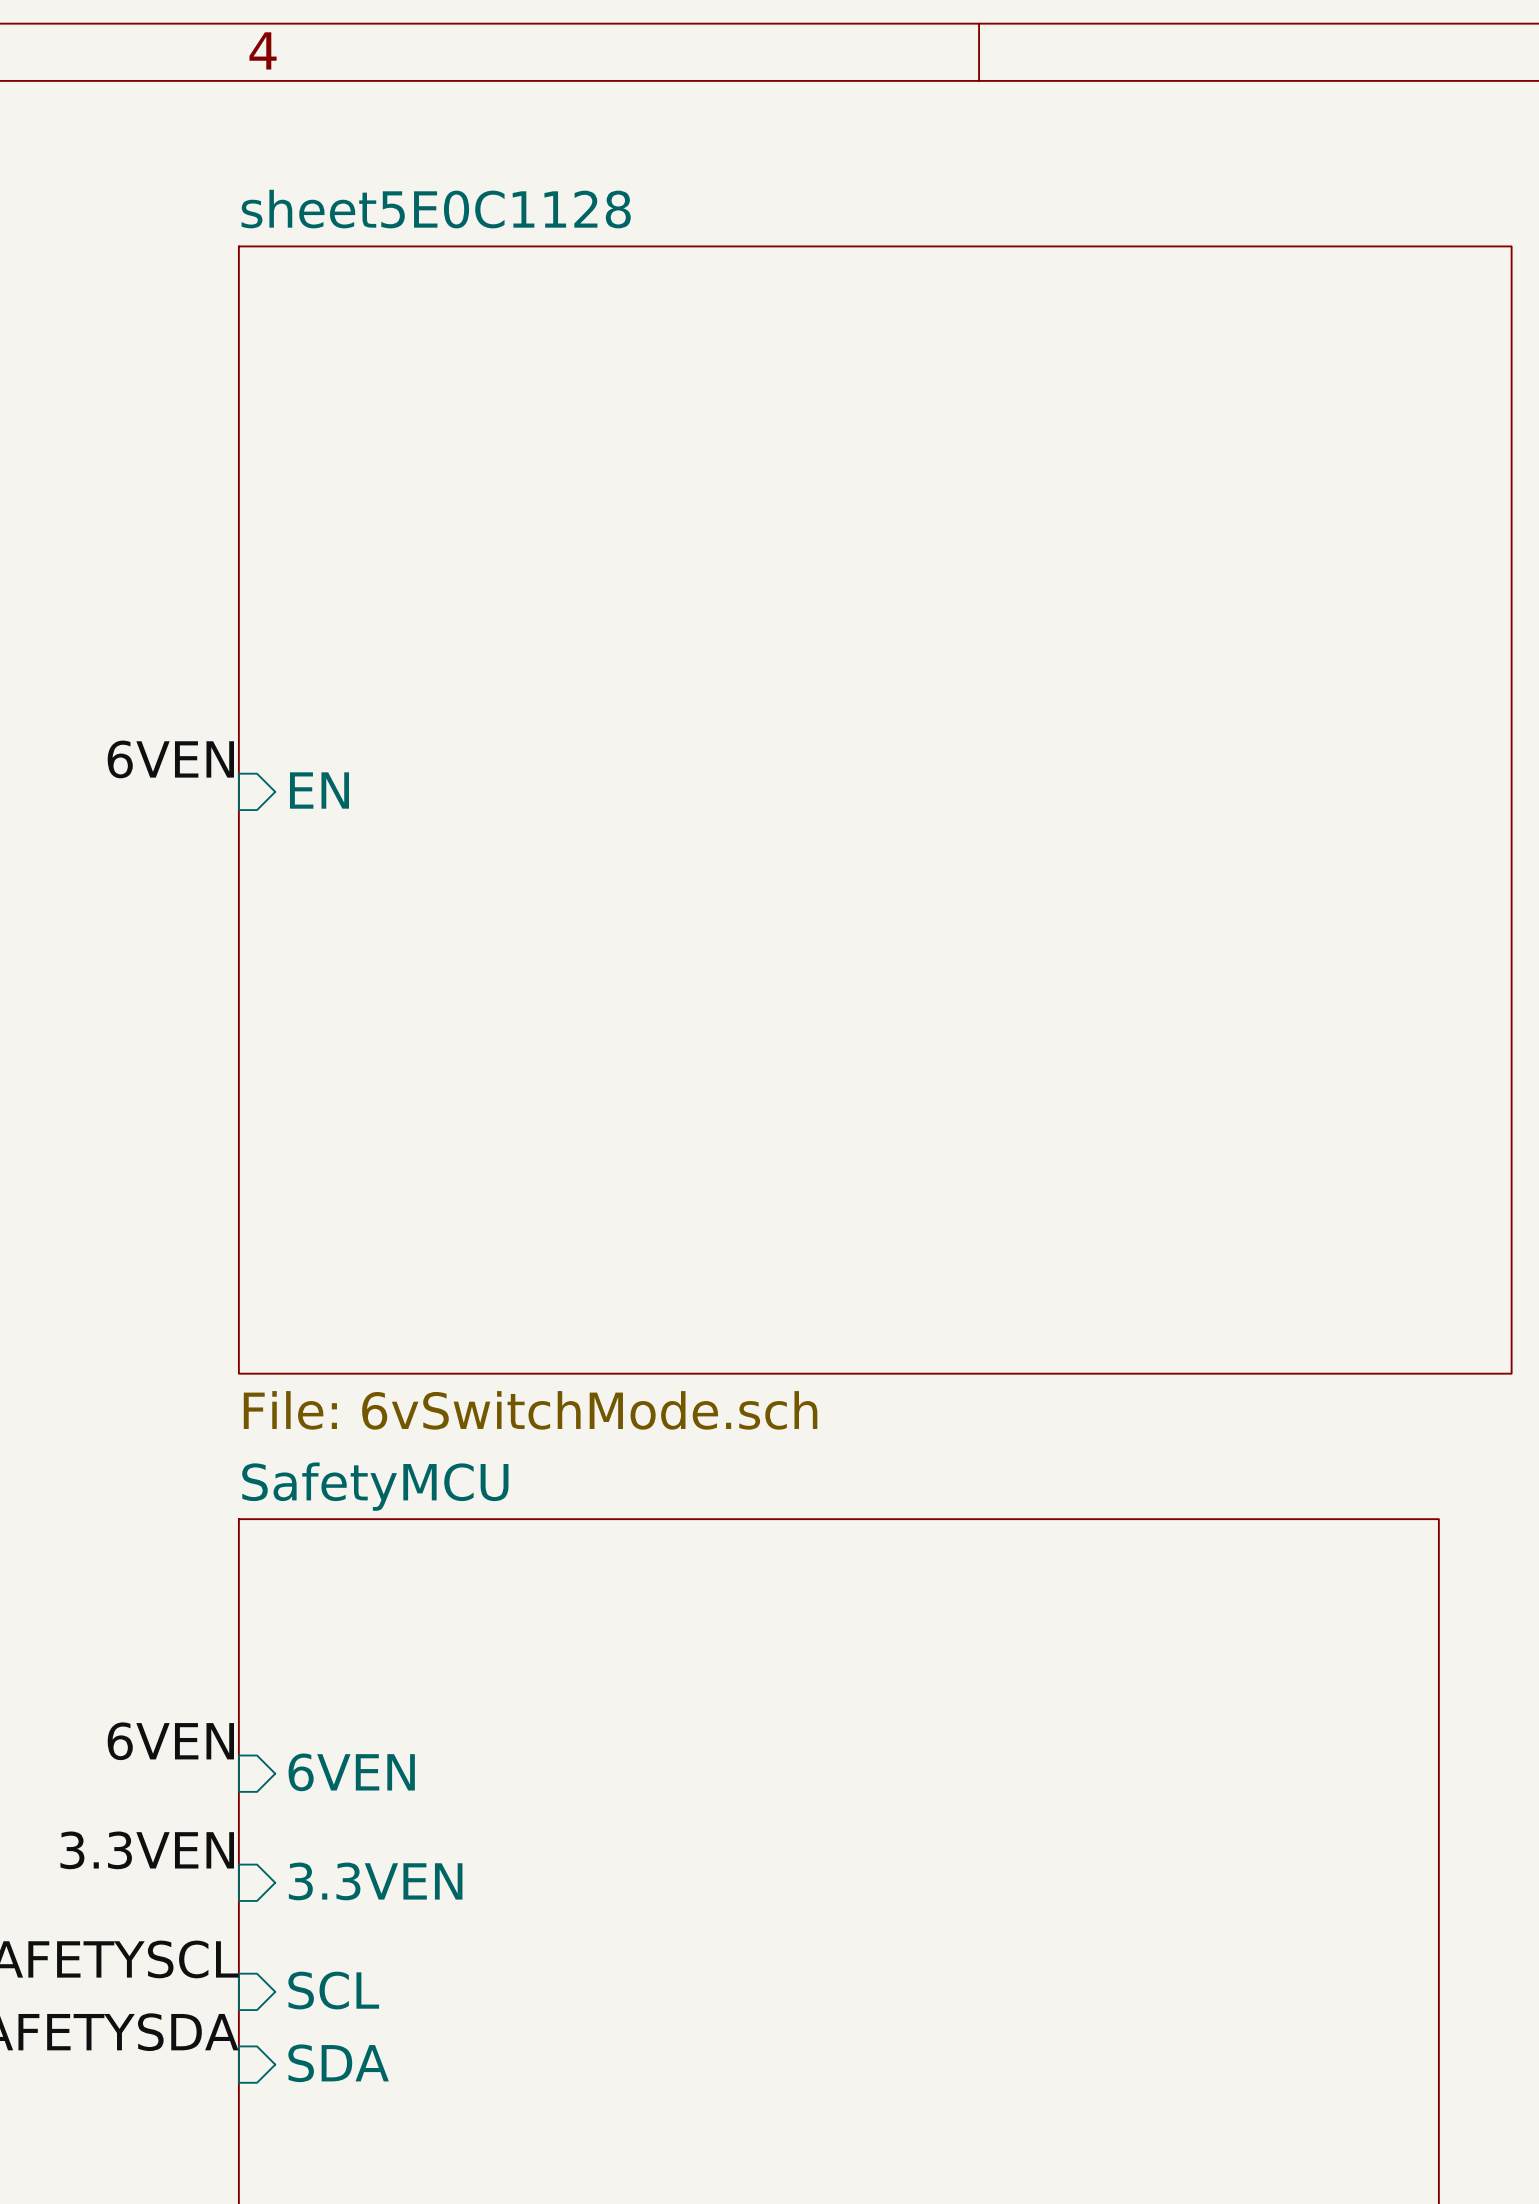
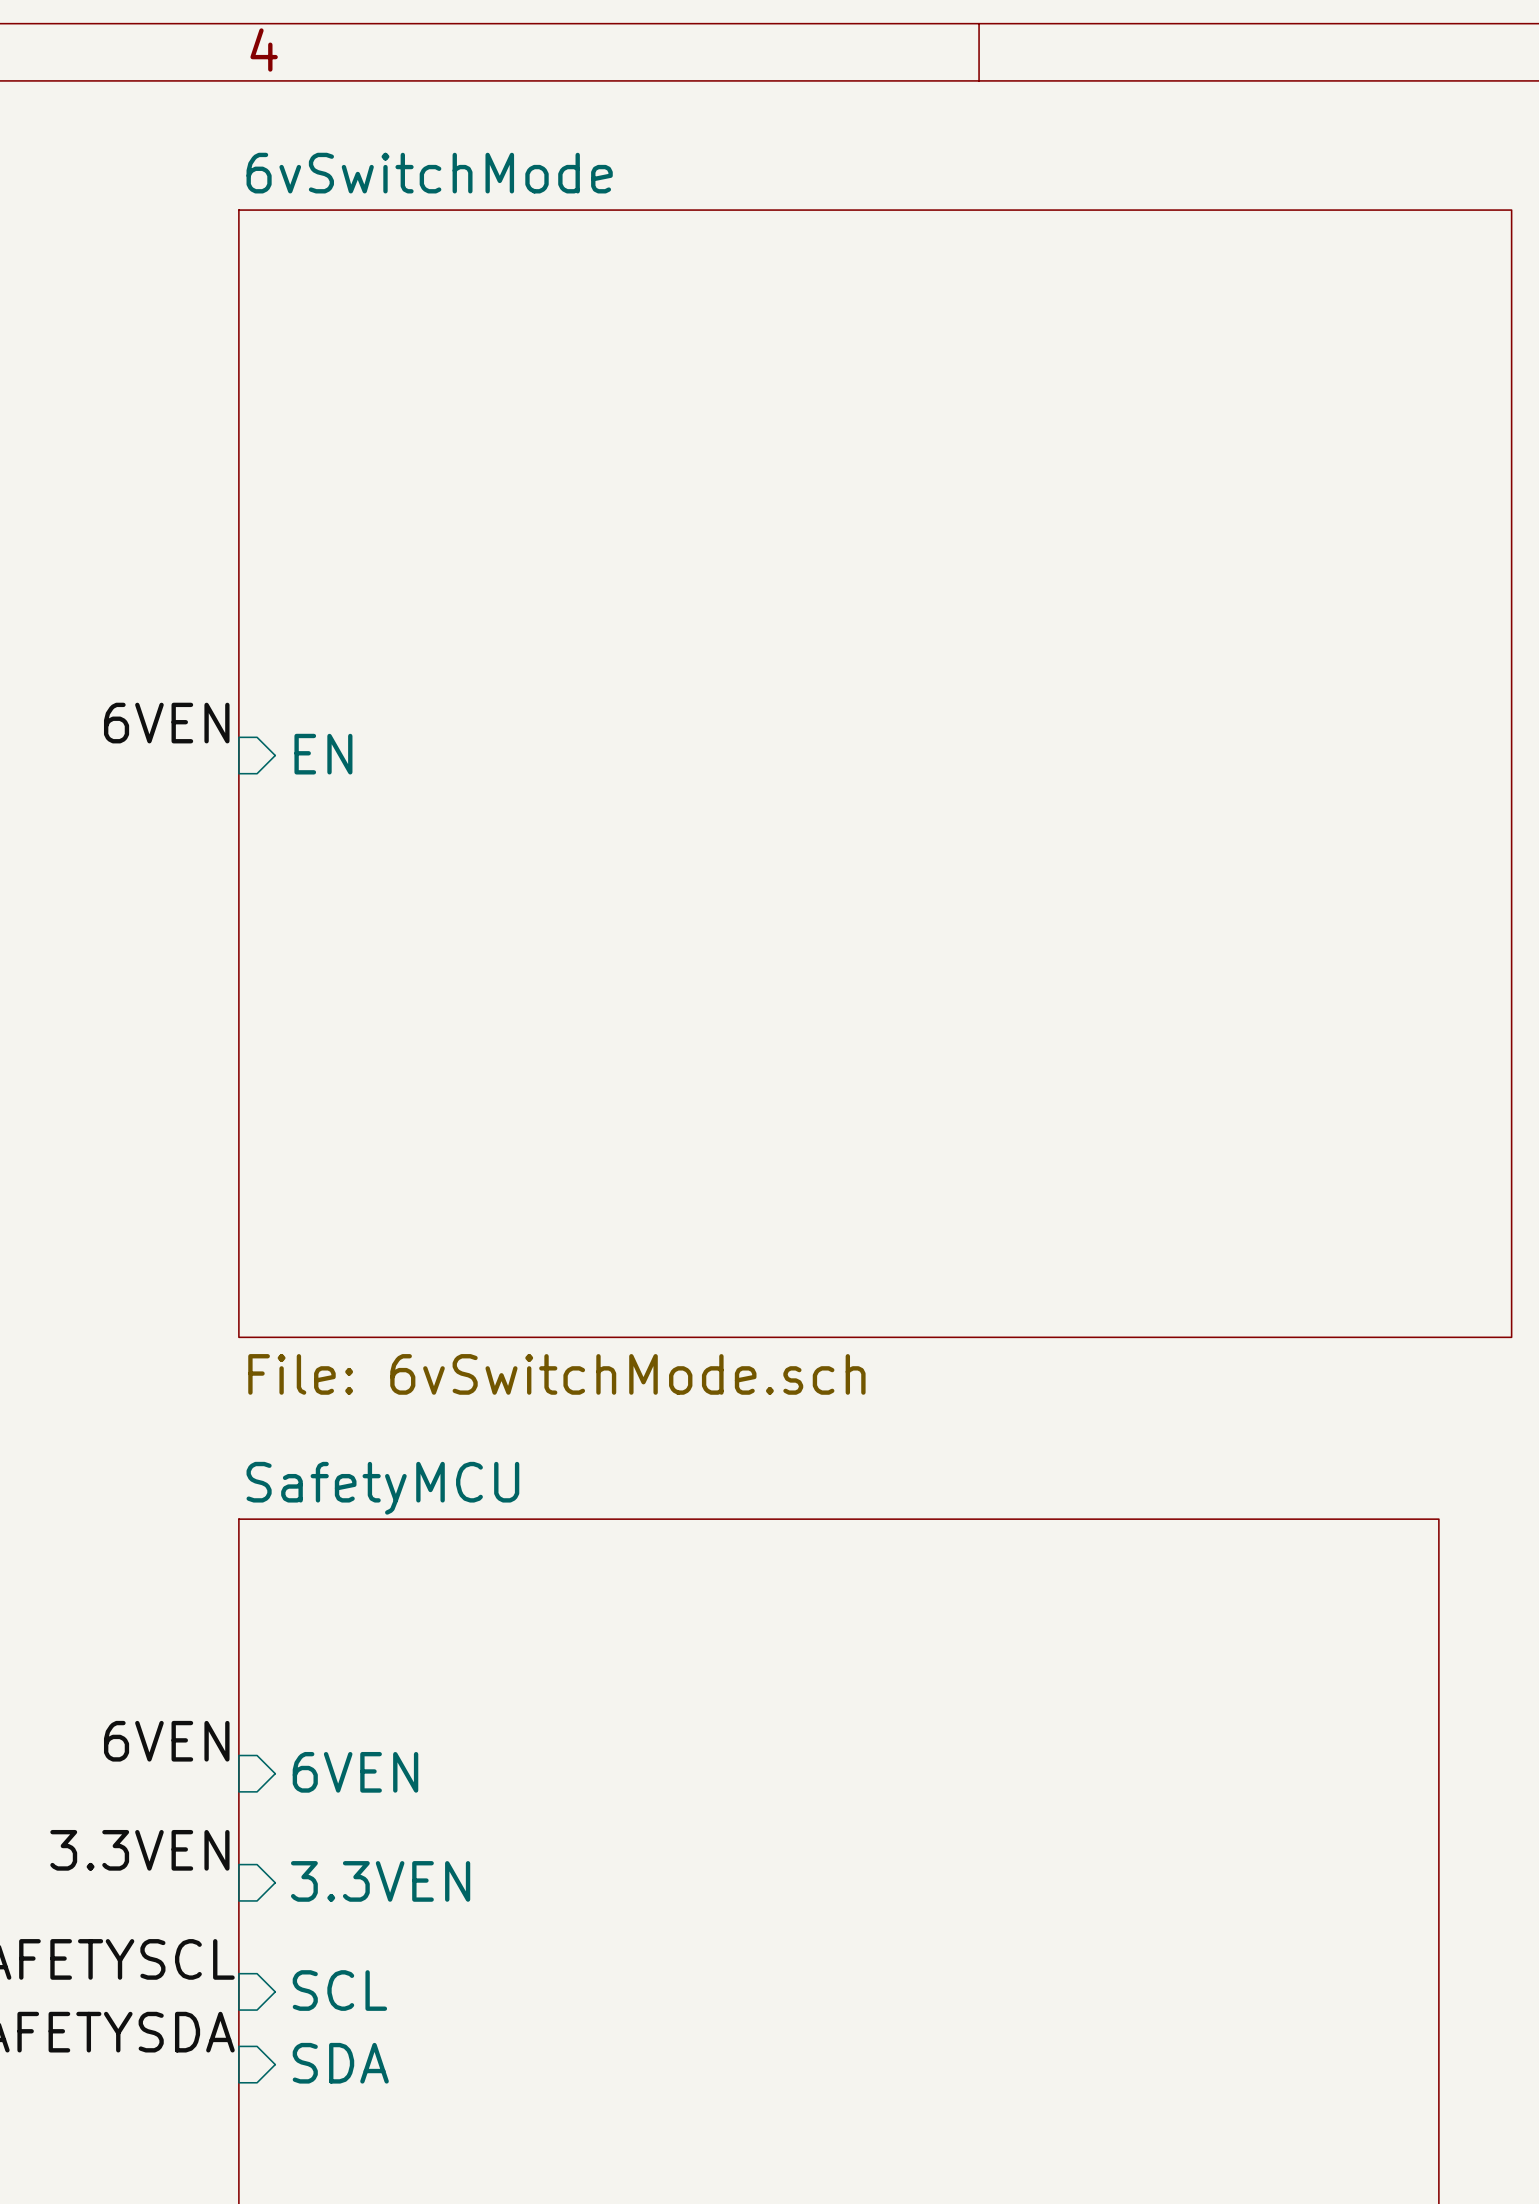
label position: 6VEN (170, 759) -> 6VEN (166, 723)
sheet 6vSwitchMode: none -> File: 6vSwitchMode.sch (875, 773)
sheet pin position: EN (319, 790) -> EN (323, 754)
sheet sheet5E0C1128: File: 6vSwitchMode.sch (875, 810) -> none

